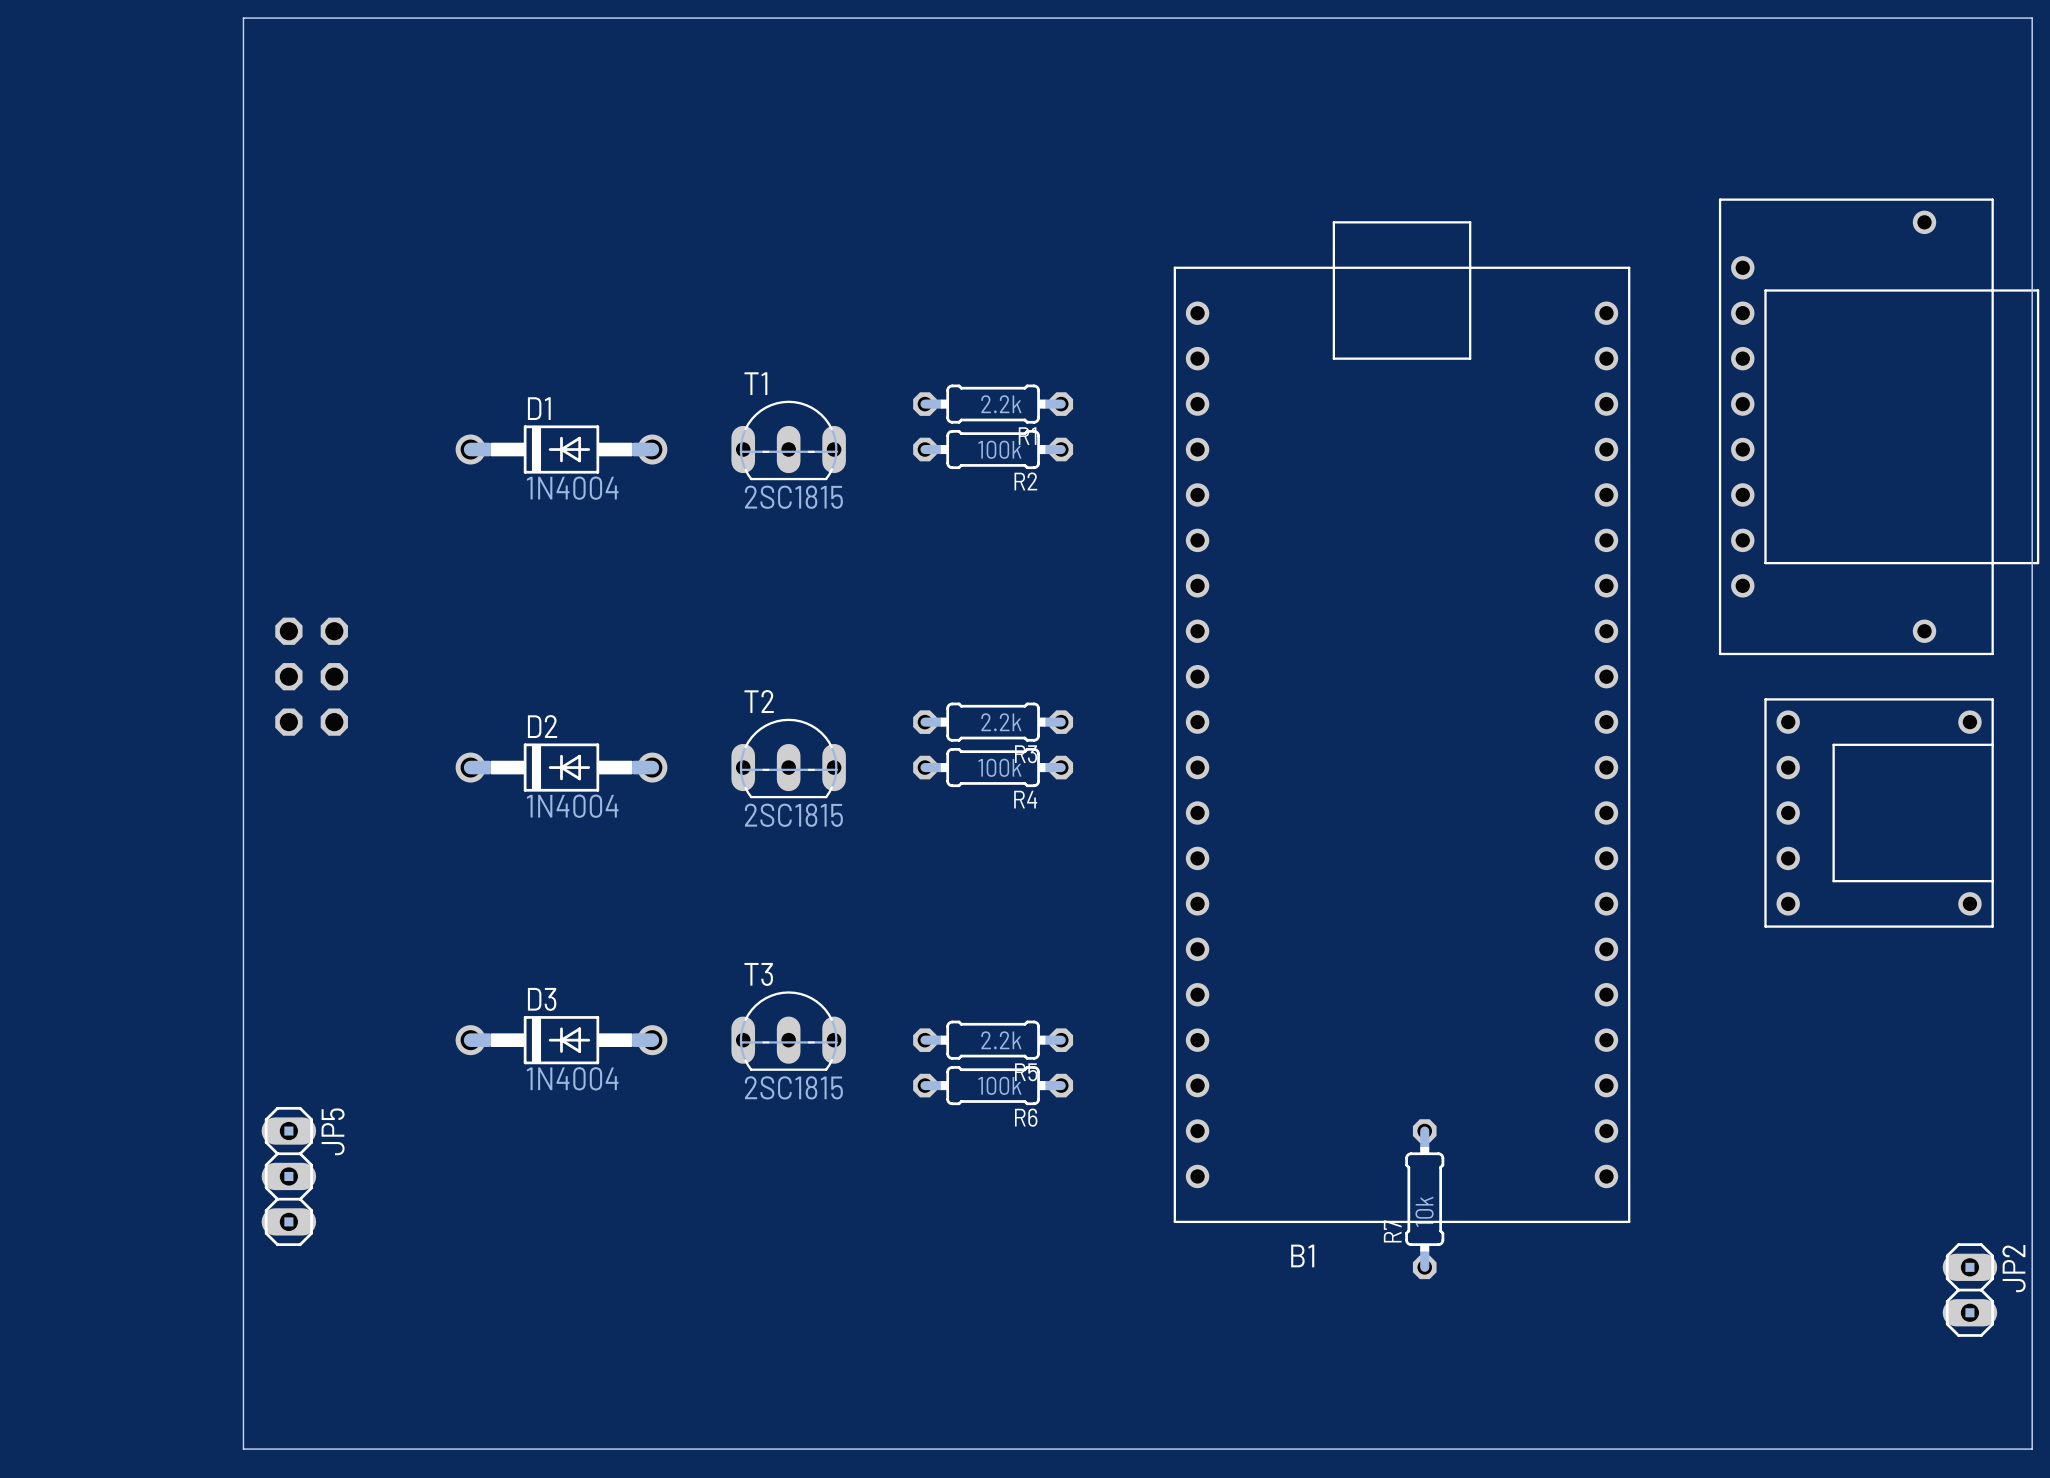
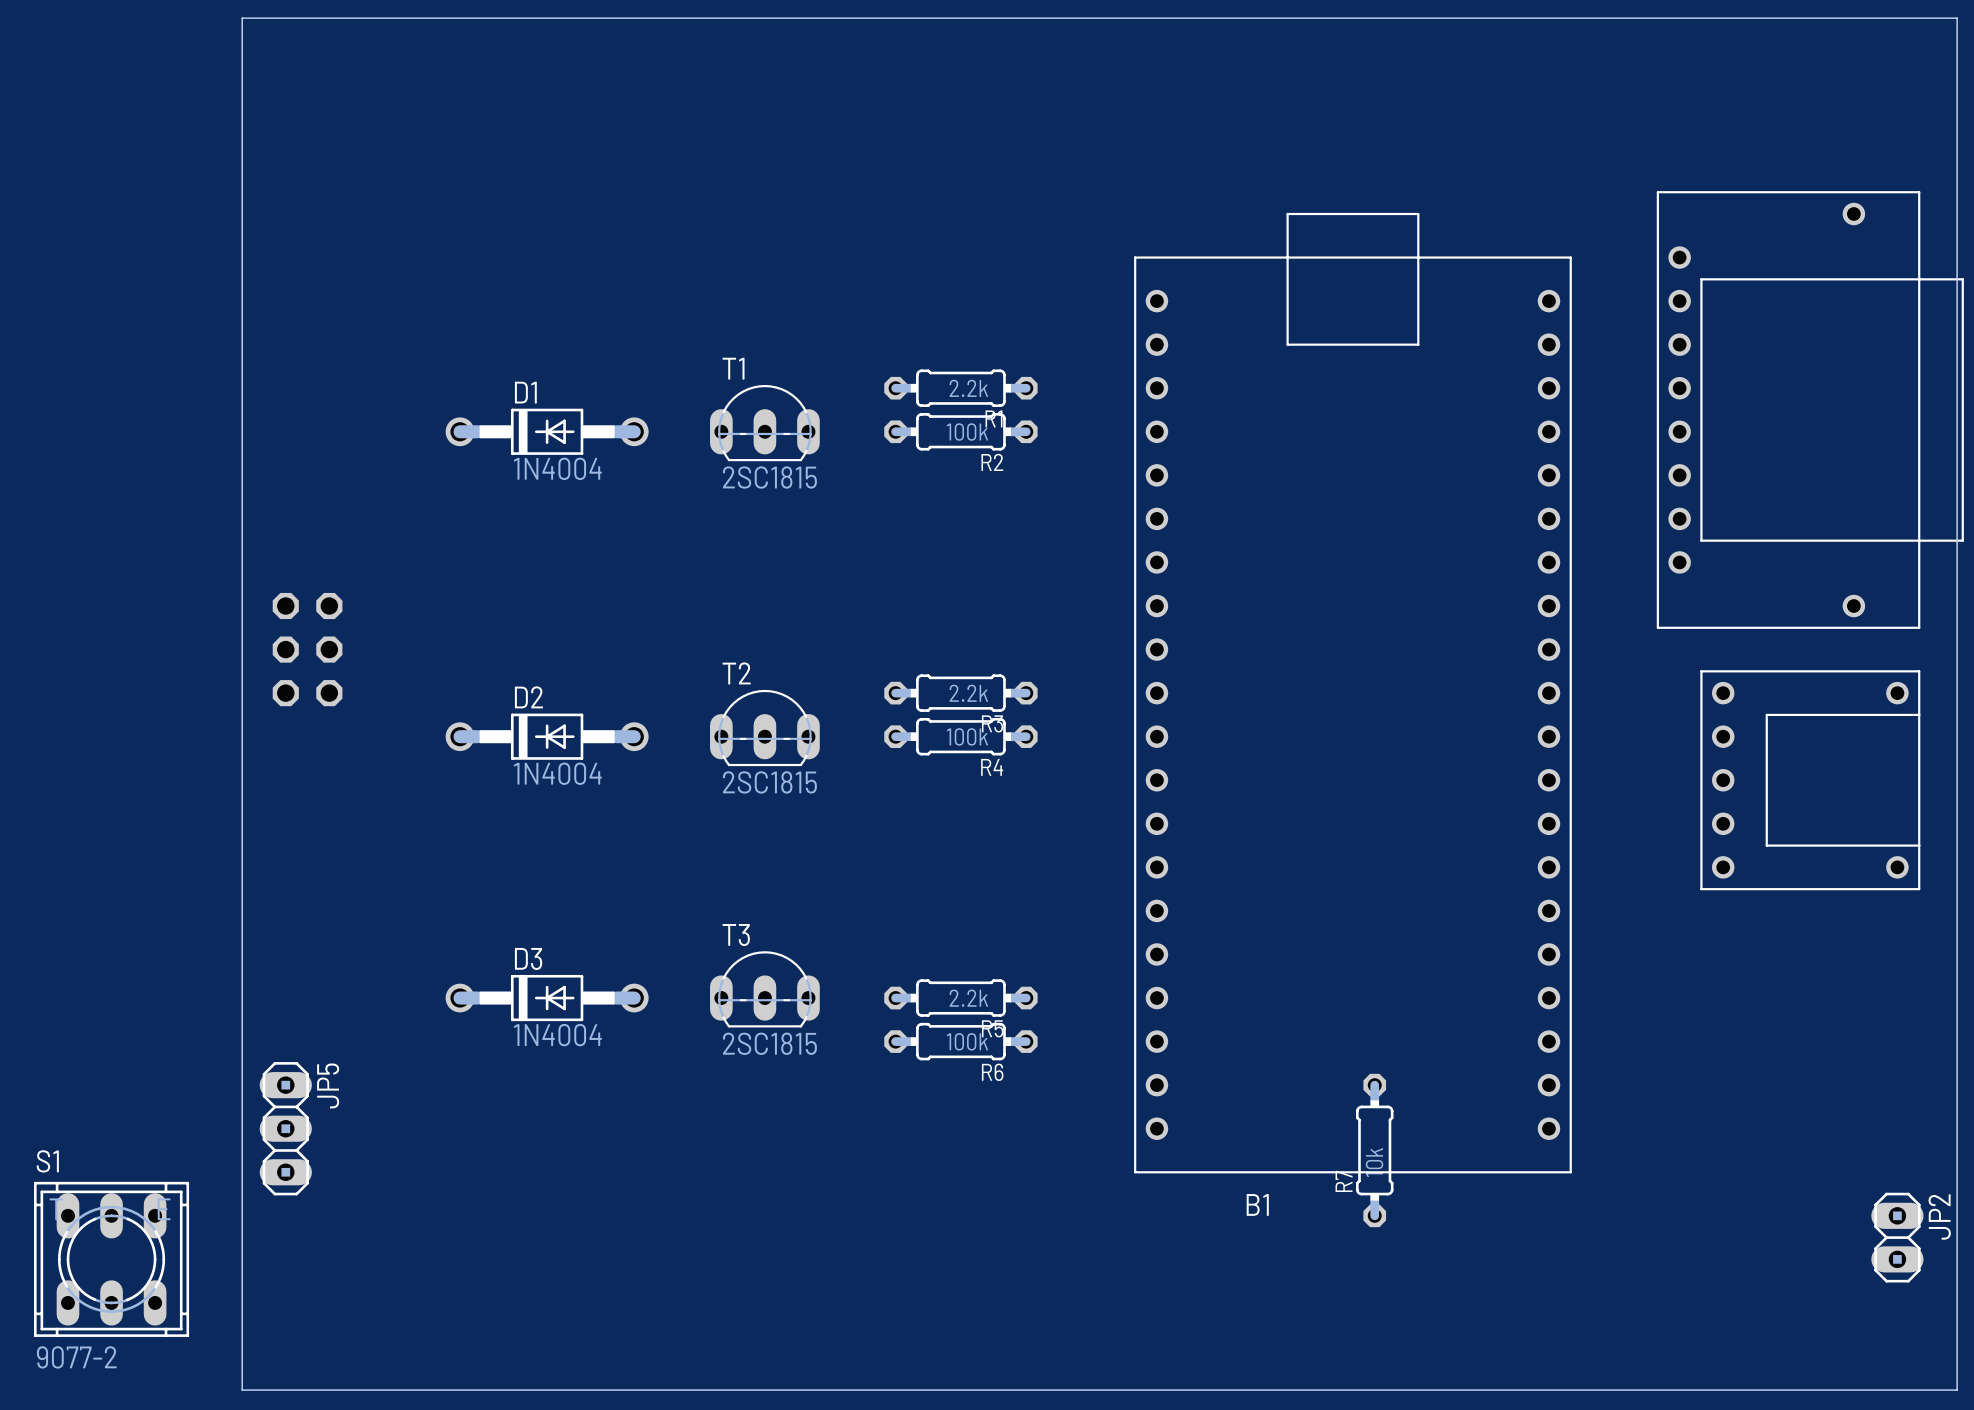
S1: none -> 9077-2 (111, 1259)

